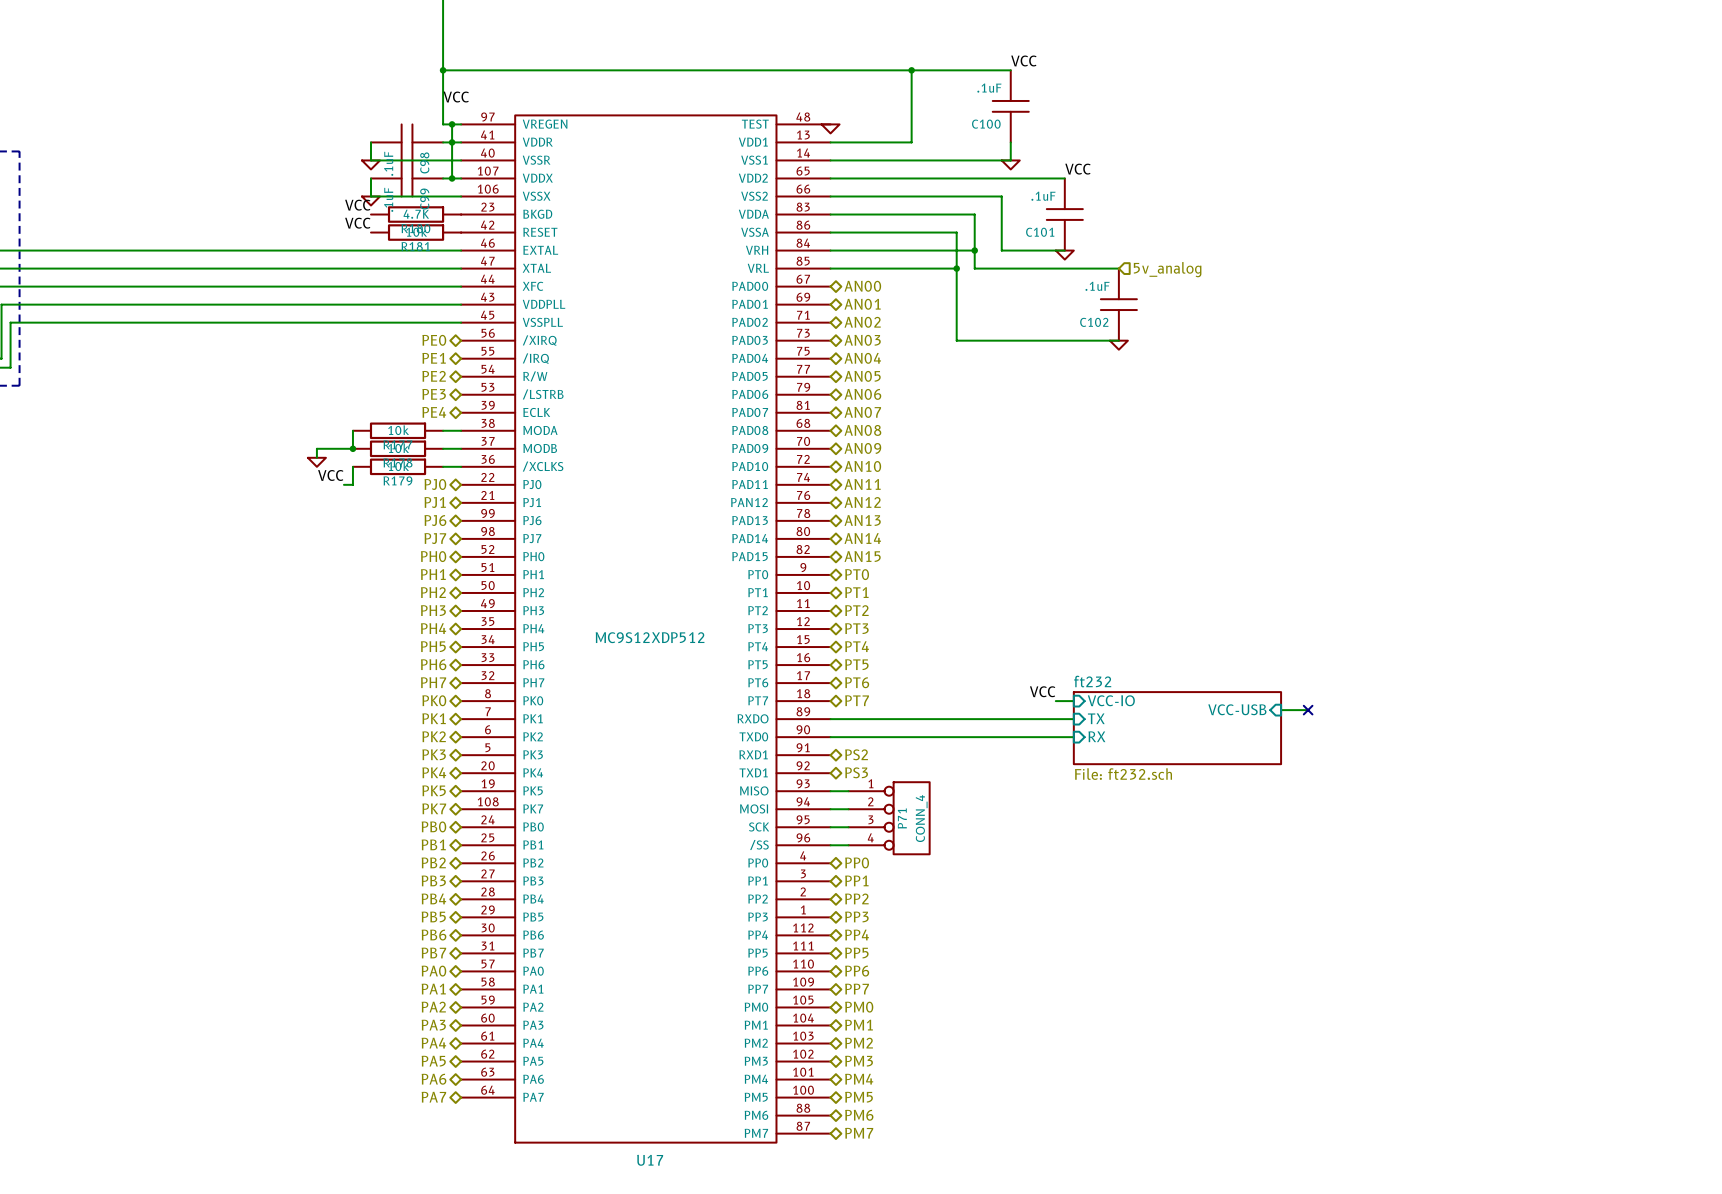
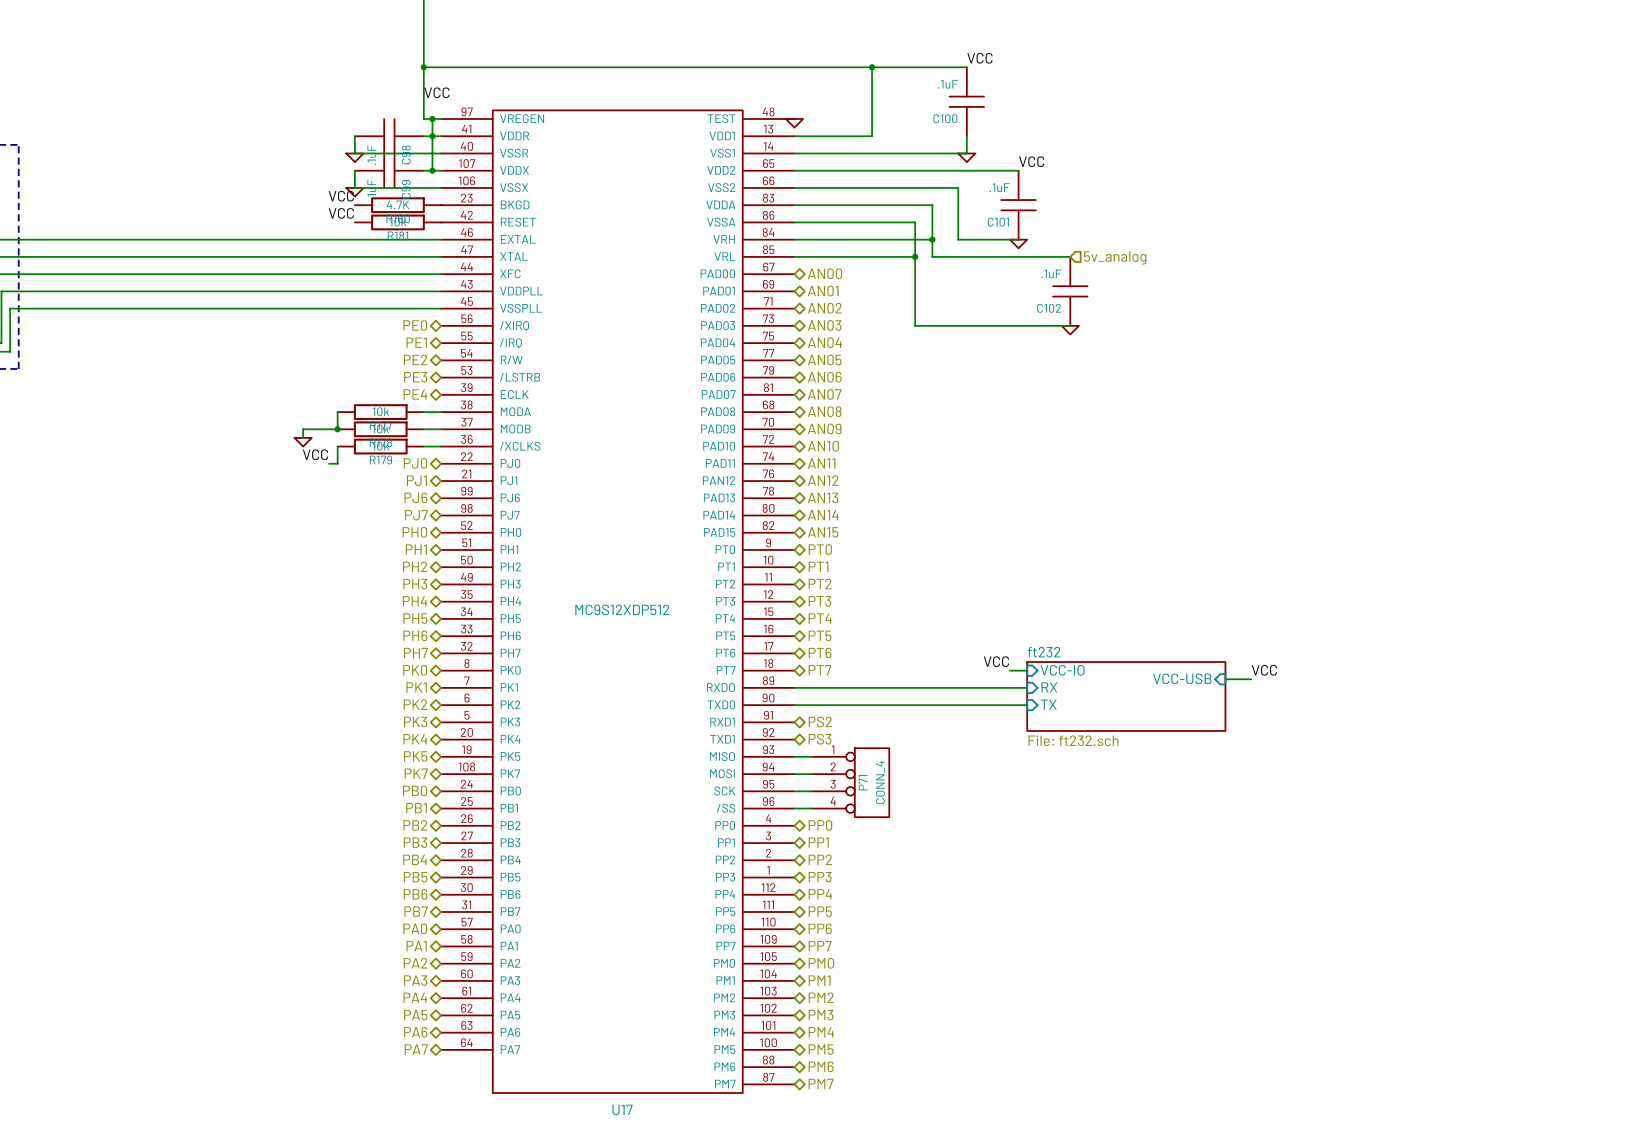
label: none -> VCC (1264, 670)
no-connect mark: (1308, 710) -> none
sheet pin: TX (1096, 718) -> RX (1049, 687)
sheet pin: RX (1096, 736) -> TX (1048, 704)

